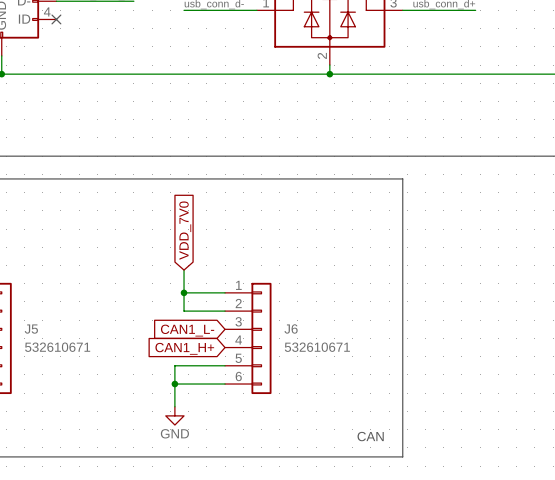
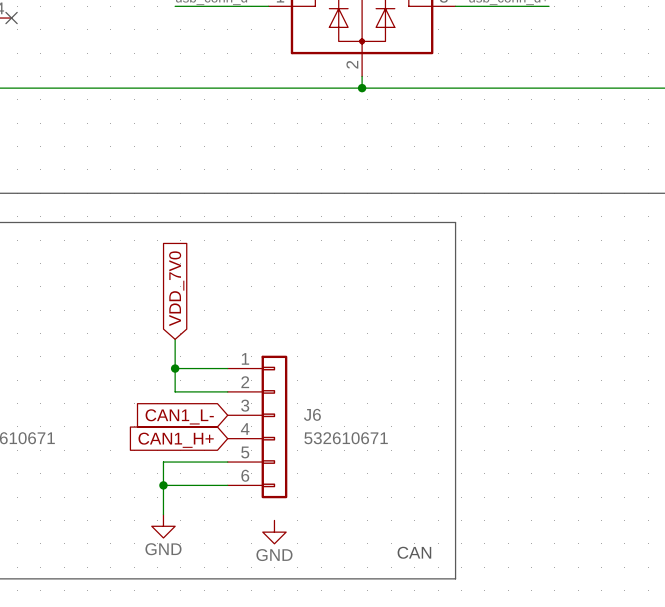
power symbol: none -> GND (274, 532)

